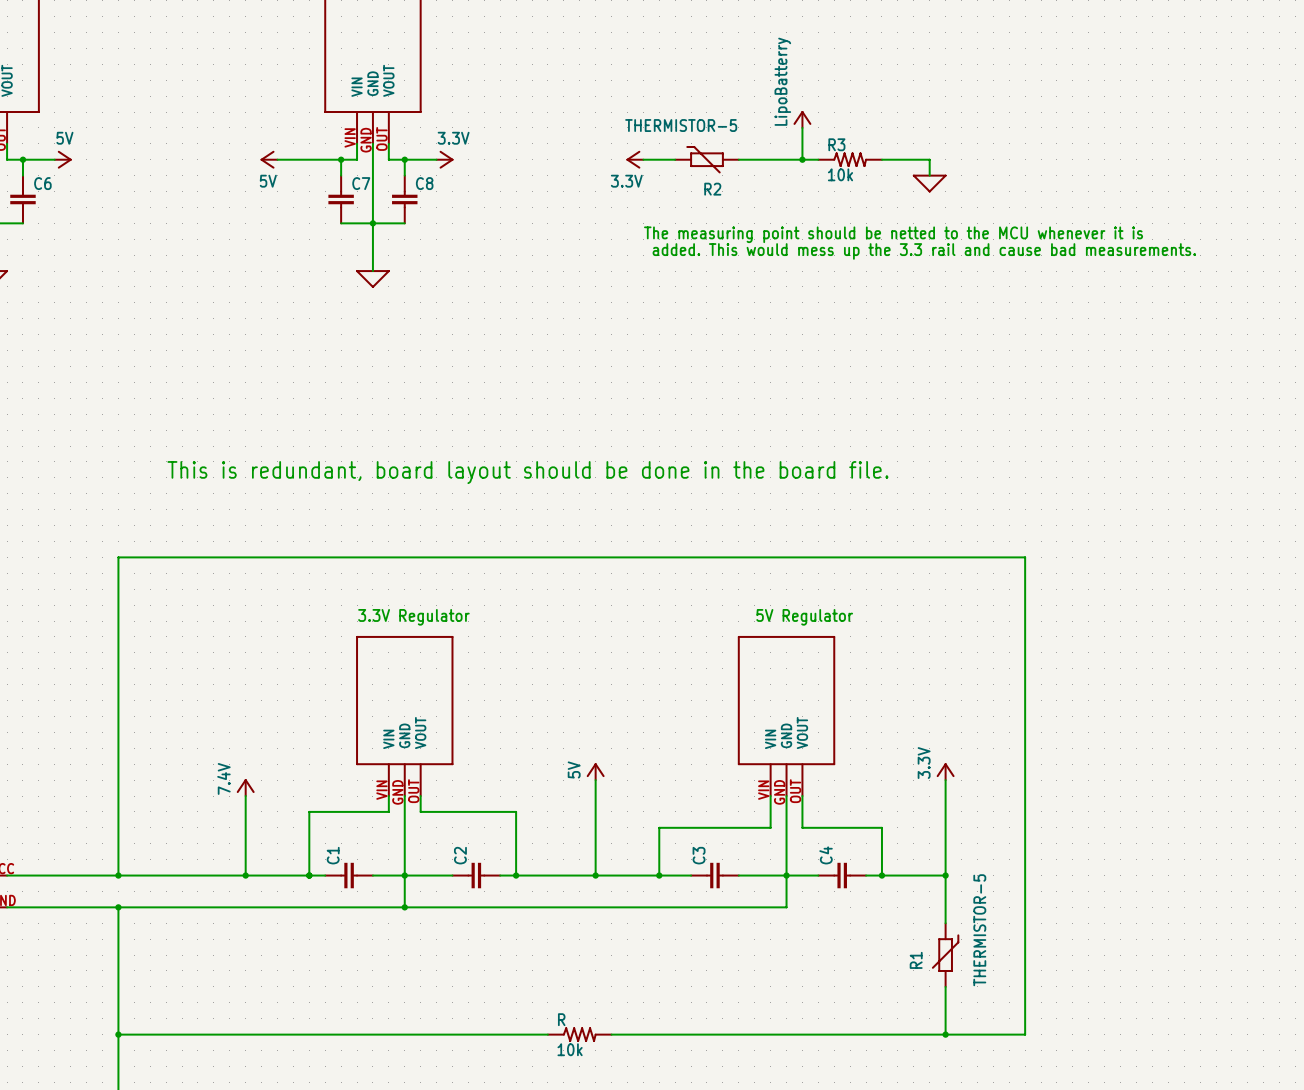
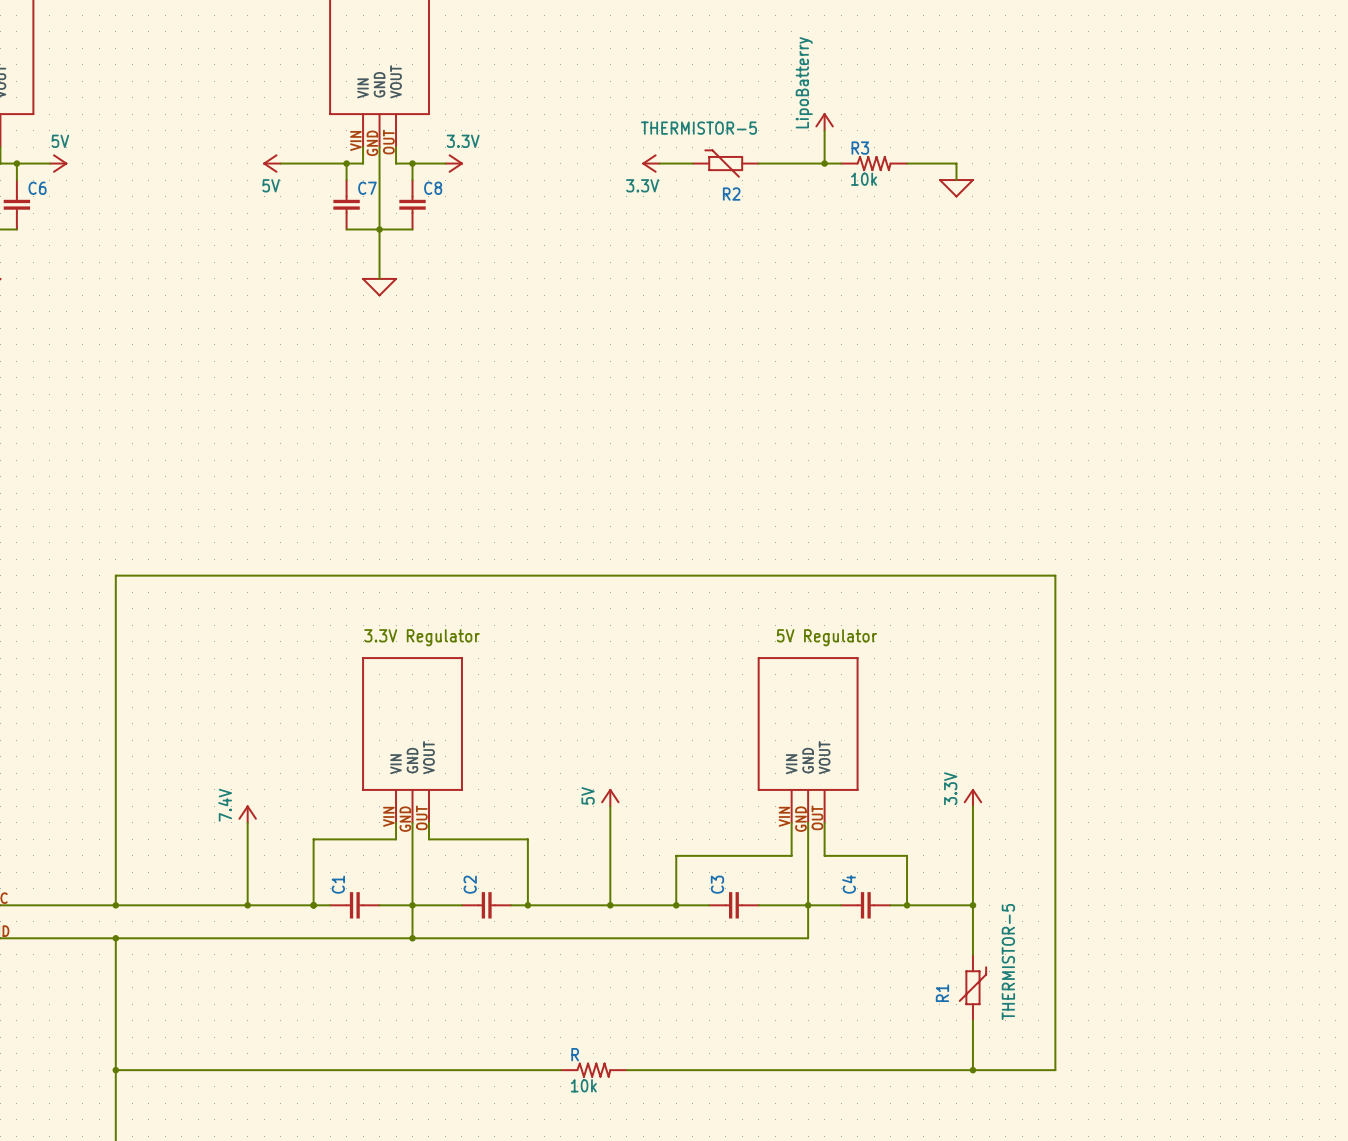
text: The measuring point should be netted to the MCU whenever it is (893, 234) -> none
text: added. This would mess up the 3.3 rail and cause bad measurements. (924, 251) -> none
text: This is redundant, board layout should be done in the board file. (527, 472) -> none

